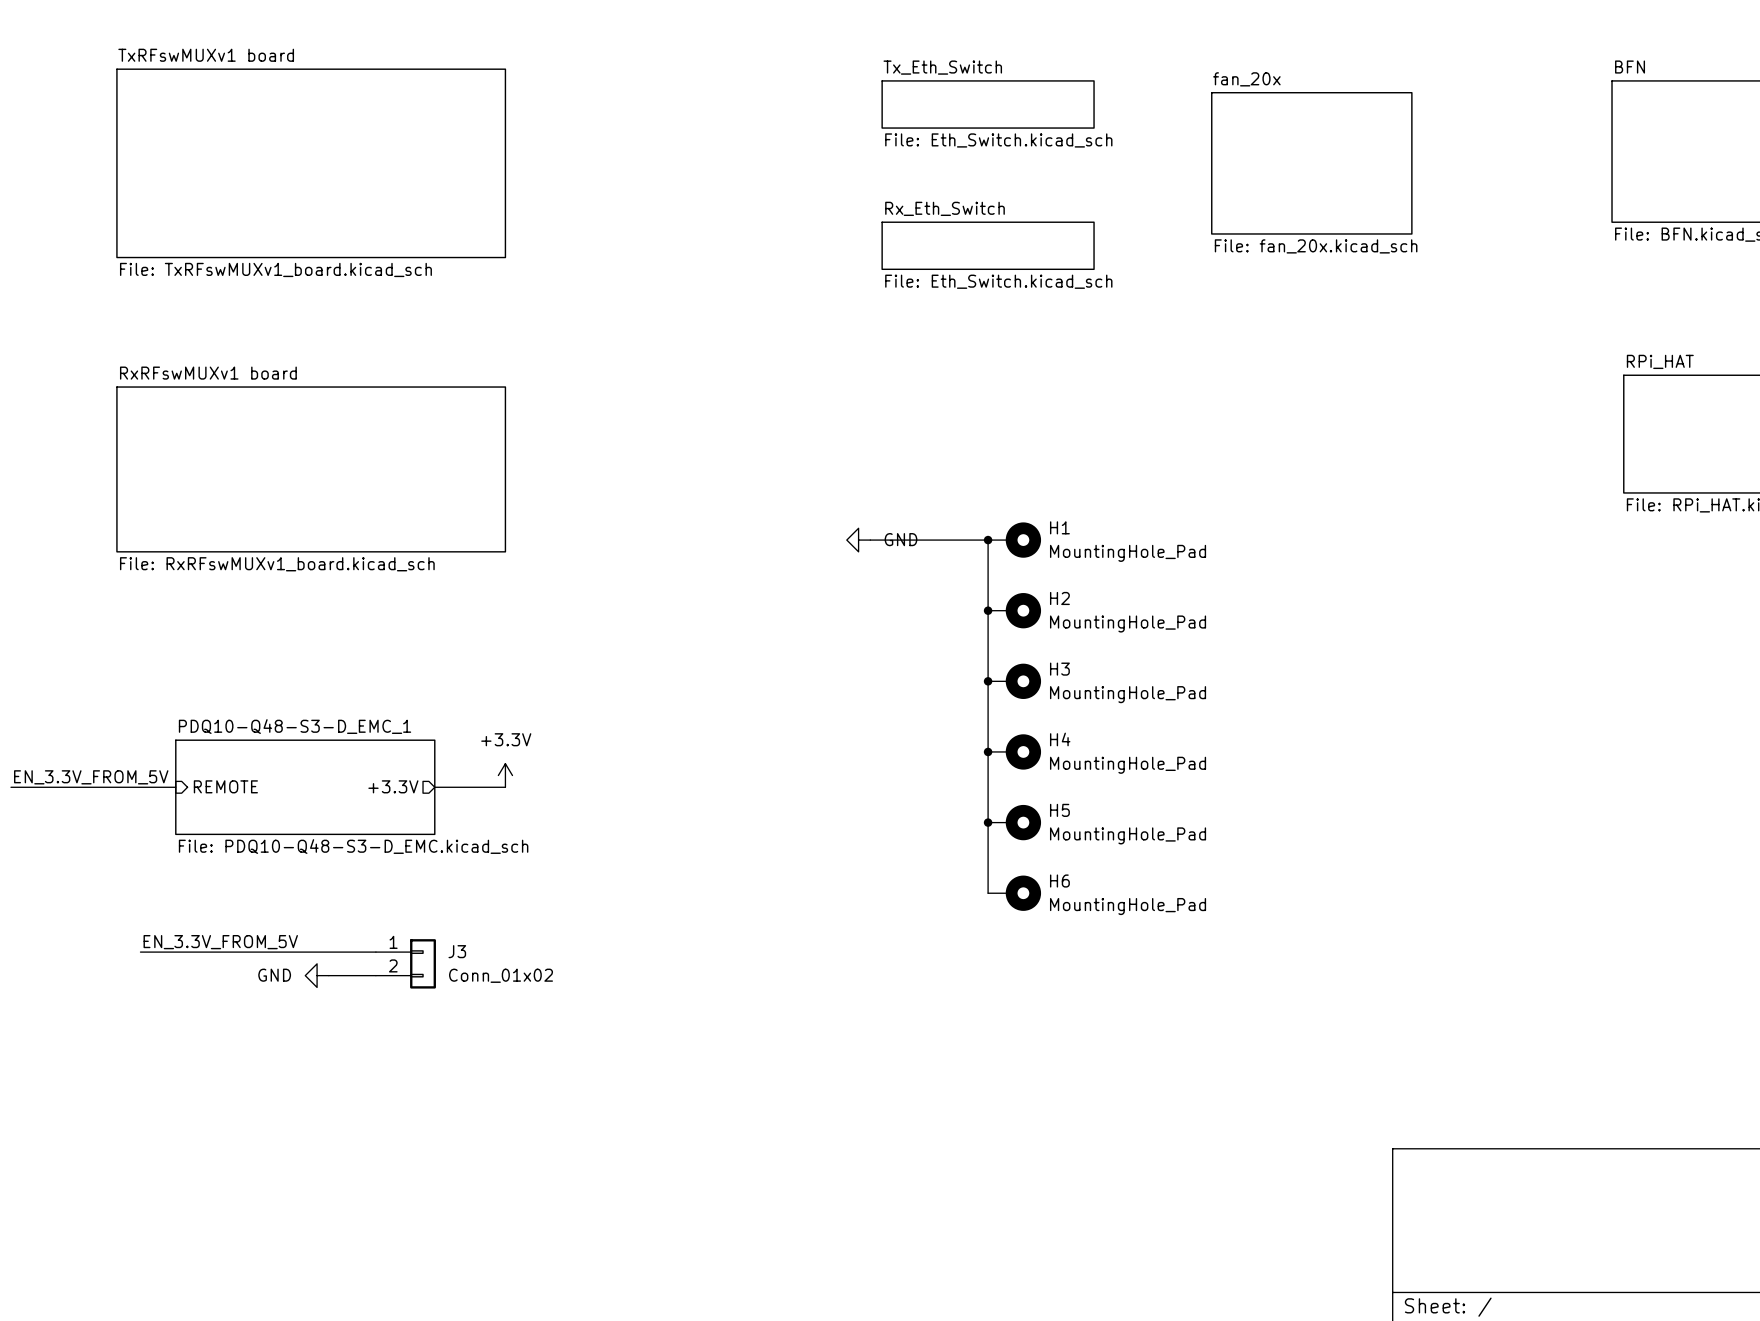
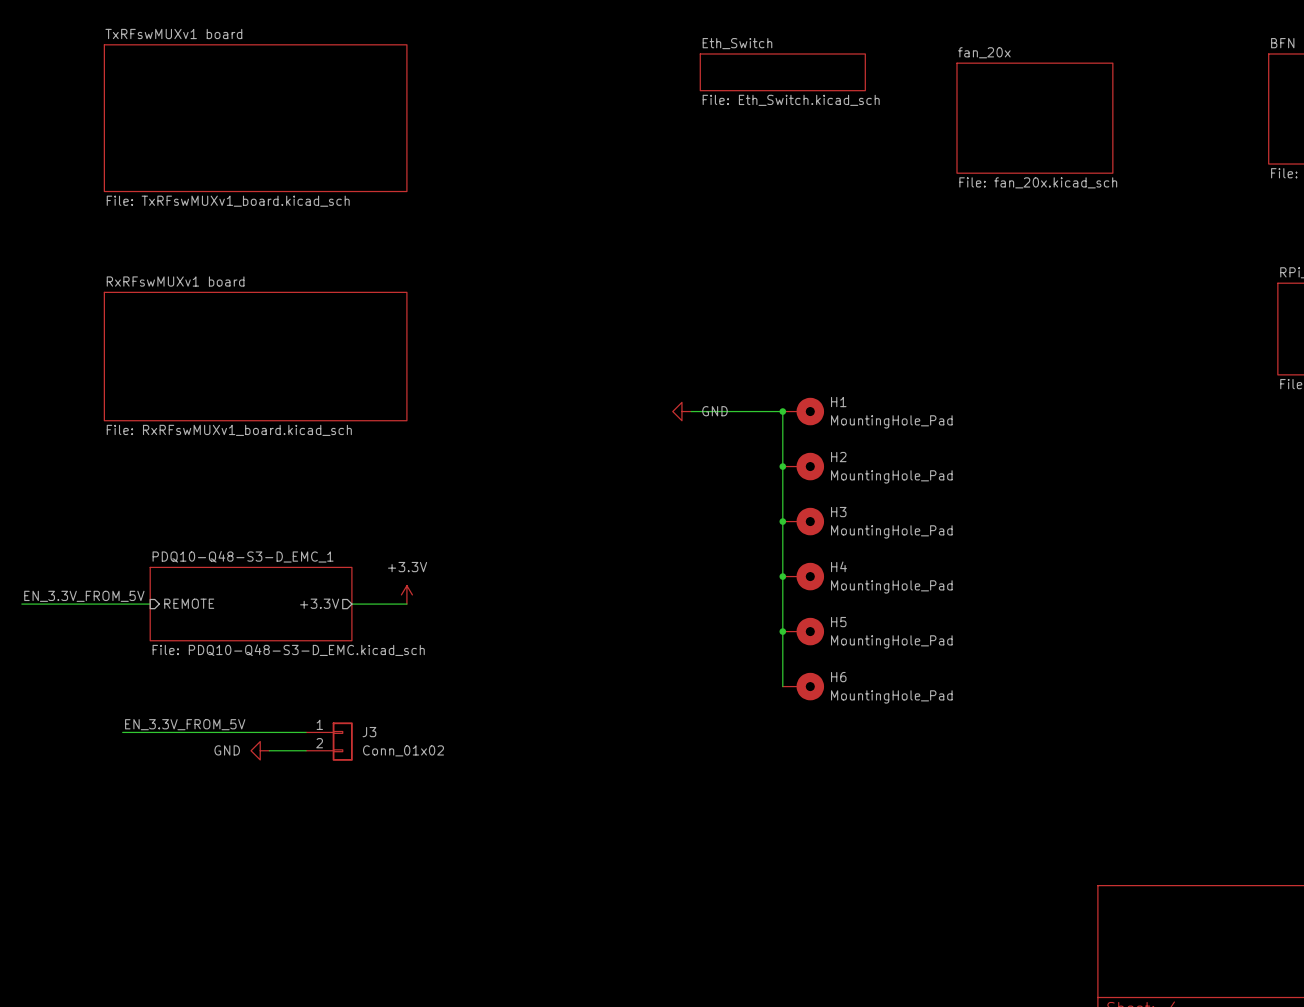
sheet Tx_Eth_Switch name: Tx_Eth_Switch (942, 67) -> Eth_Switch (737, 43)
sheet Rx_Eth_Switch: File: Eth_Switch.kicad_sch (988, 245) -> none

